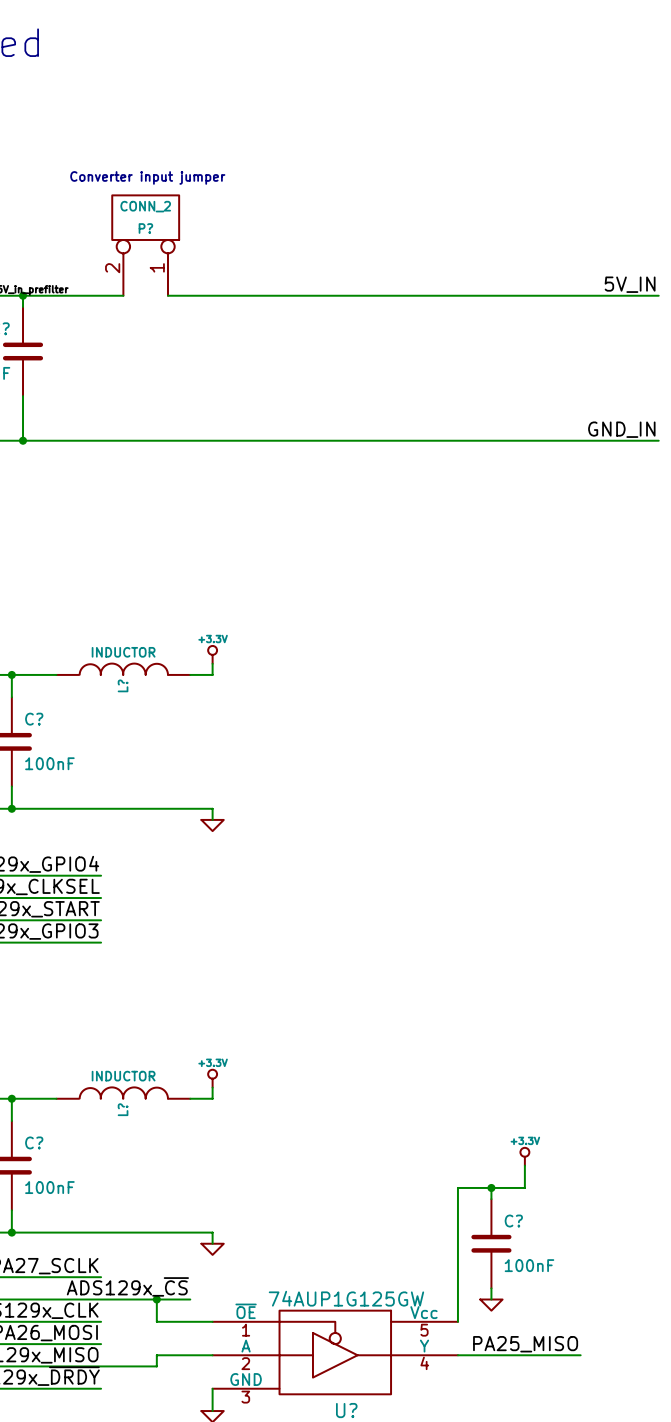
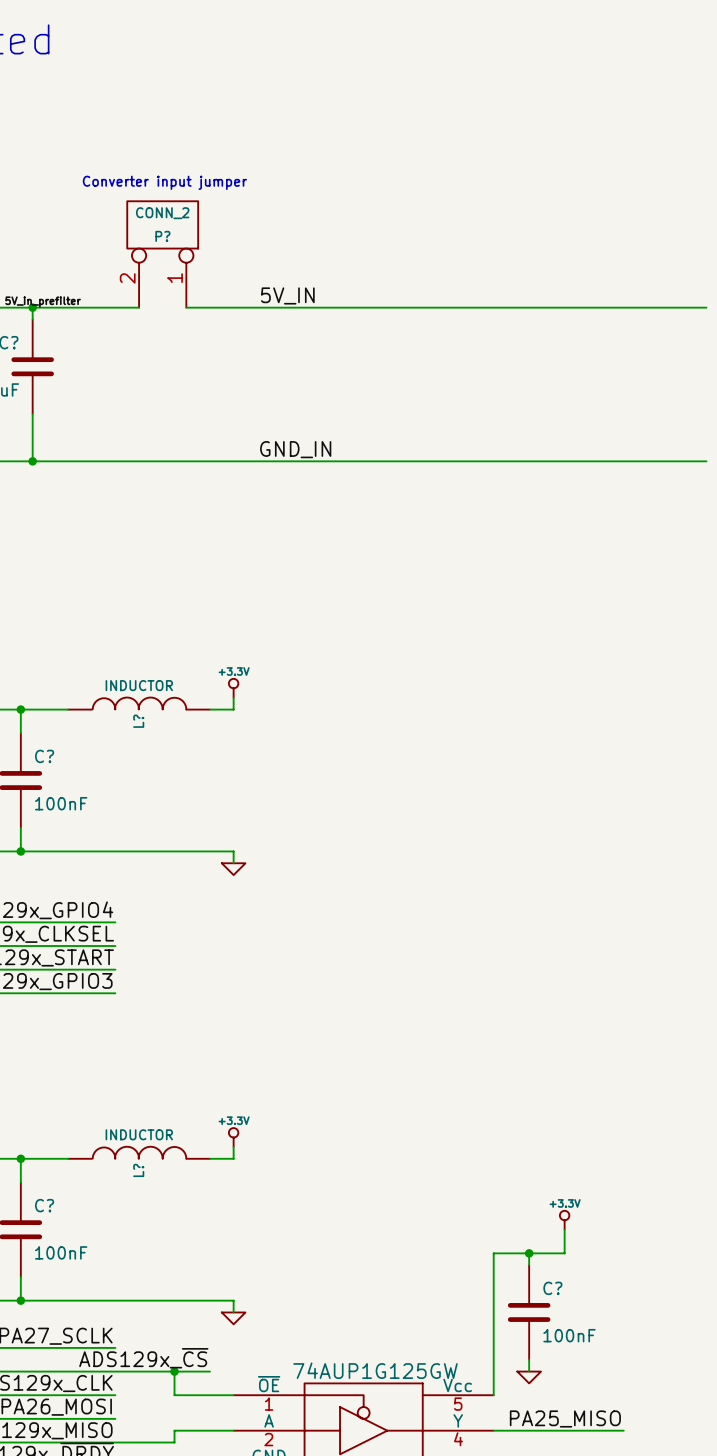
label: none -> 5V_IN (287, 295)
label: 5V_IN (630, 284) -> none
label: none -> GND_IN (295, 449)
label: GND_IN (621, 429) -> none

